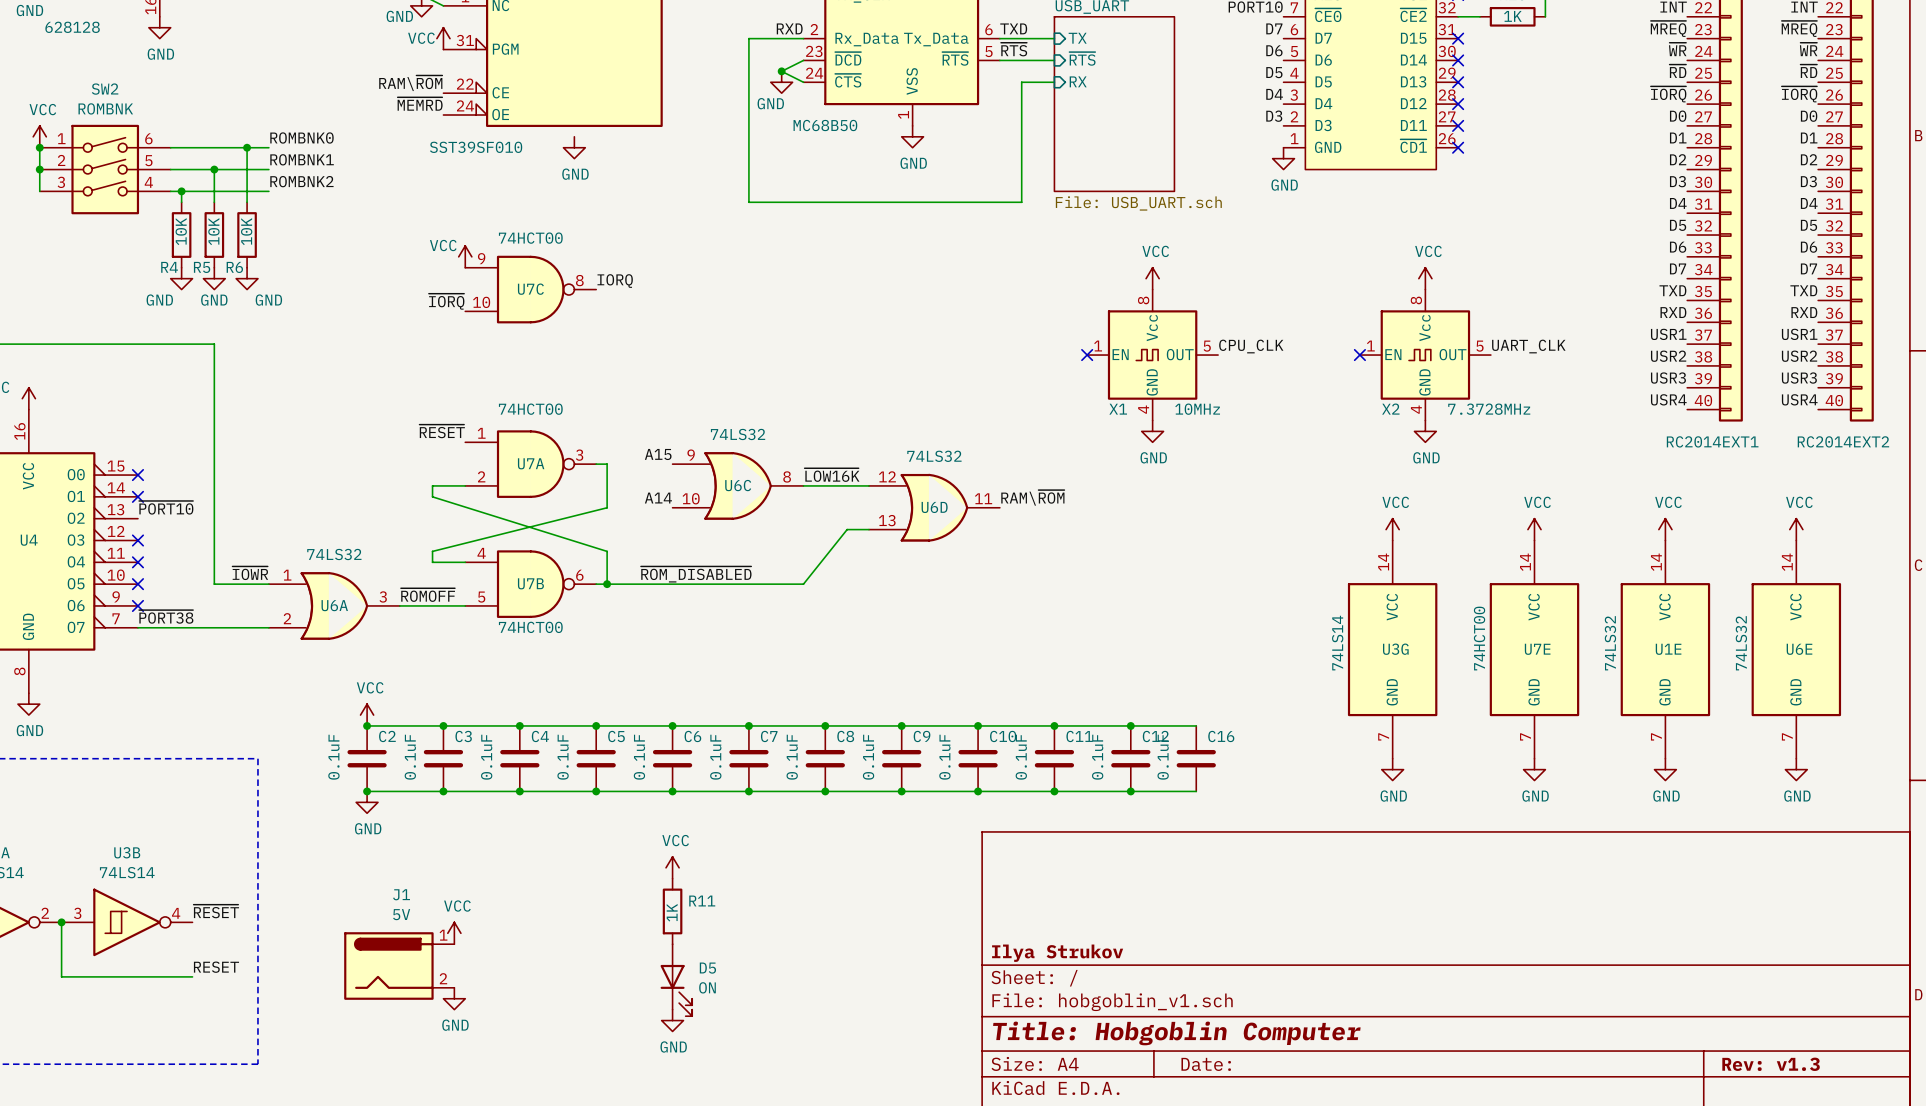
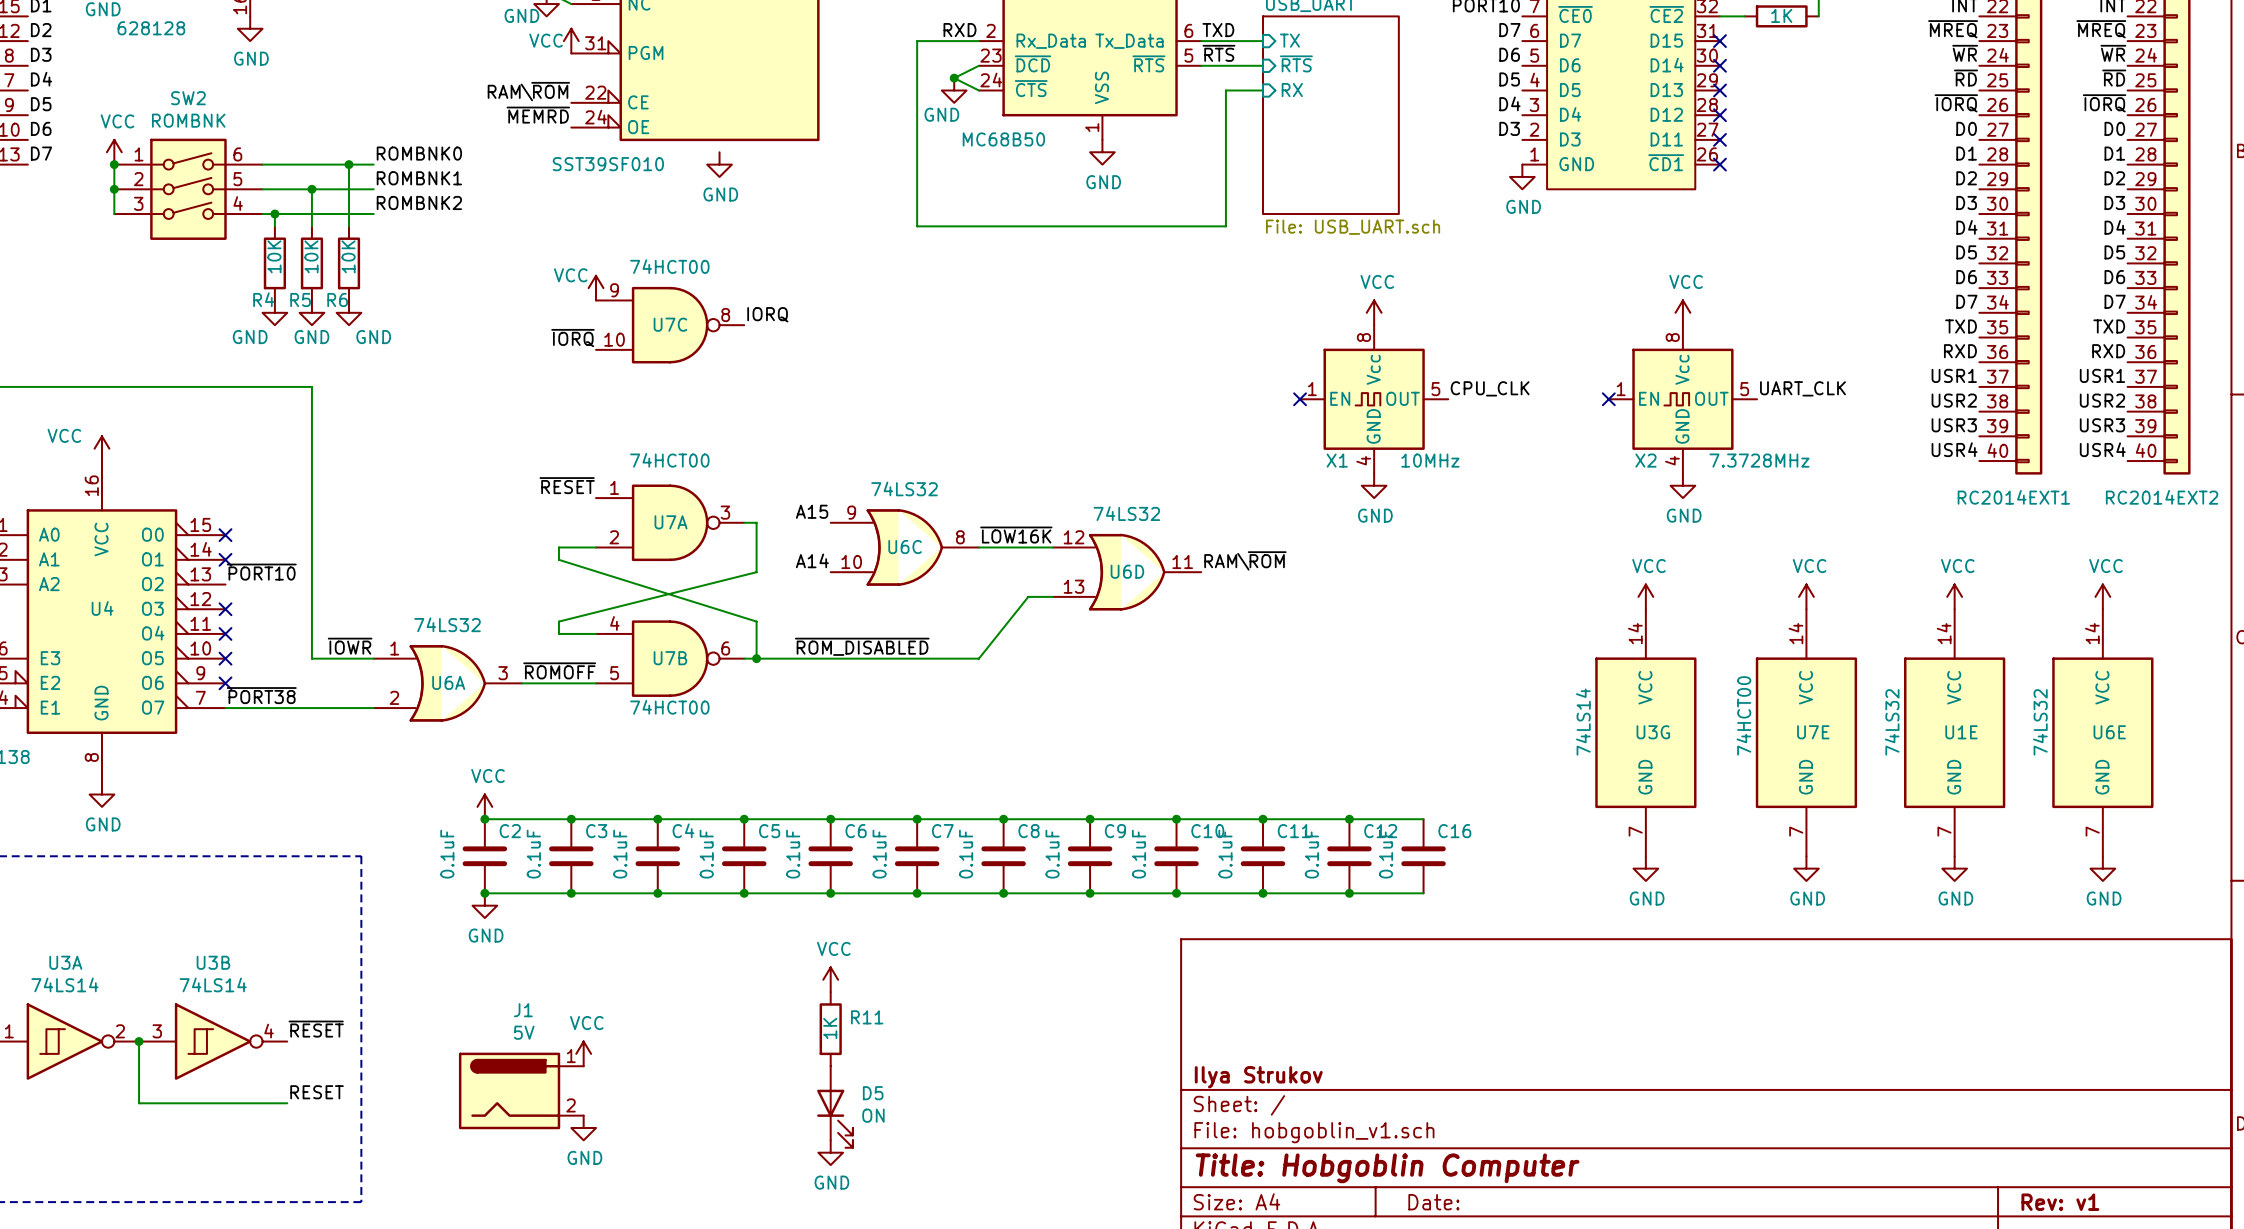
title block: Rev: v1.3 (1771, 1064) -> Rev: v1 (2060, 1202)

